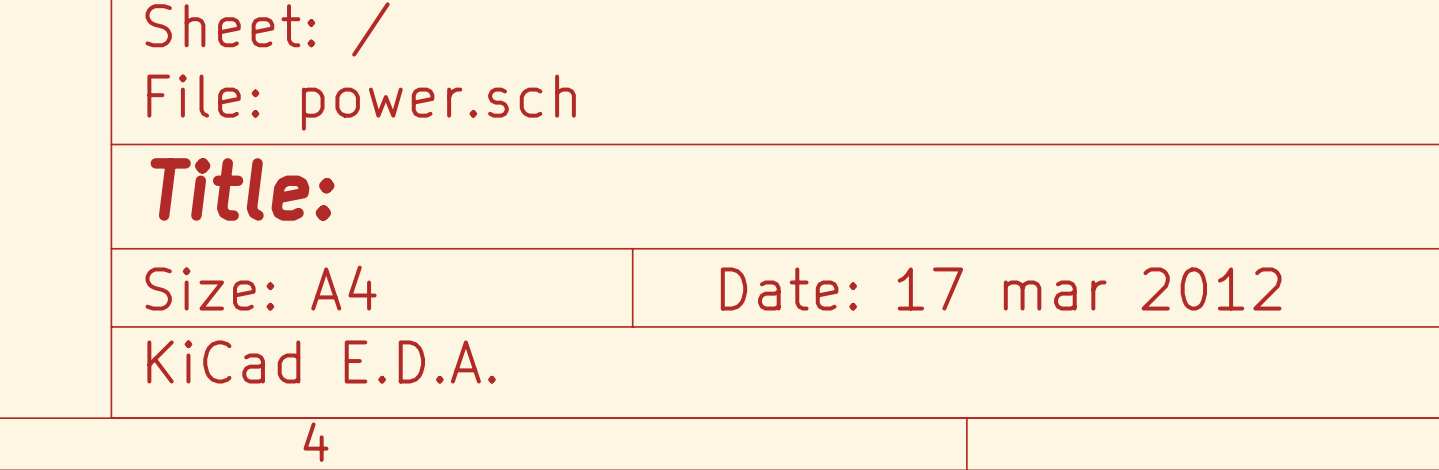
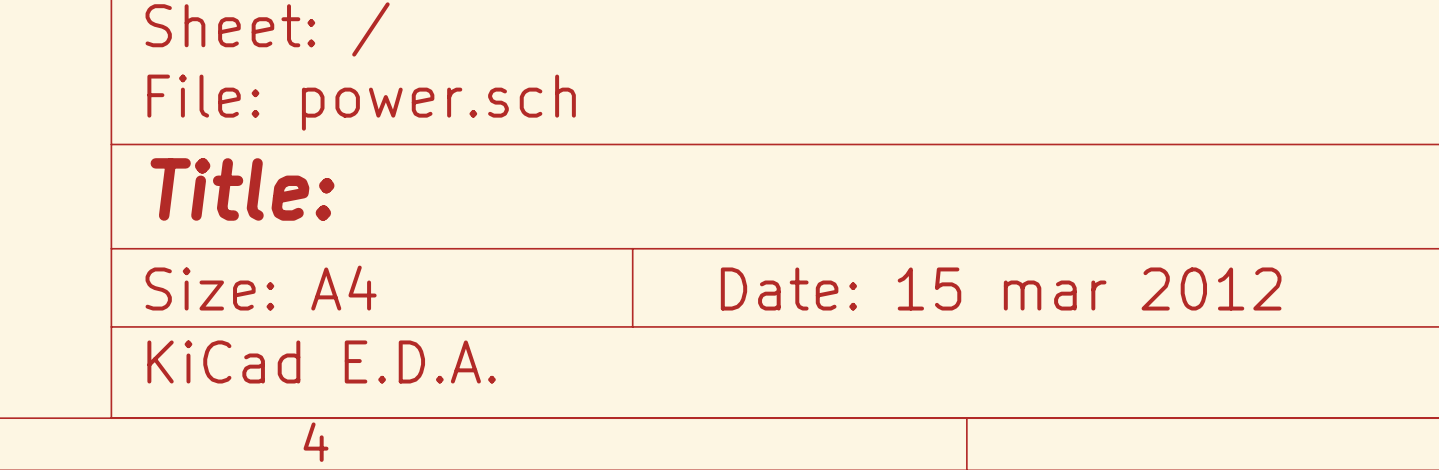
title block: Date: 17 mar 2012 (1001, 288) -> Date: 15 mar 2012 (1001, 288)

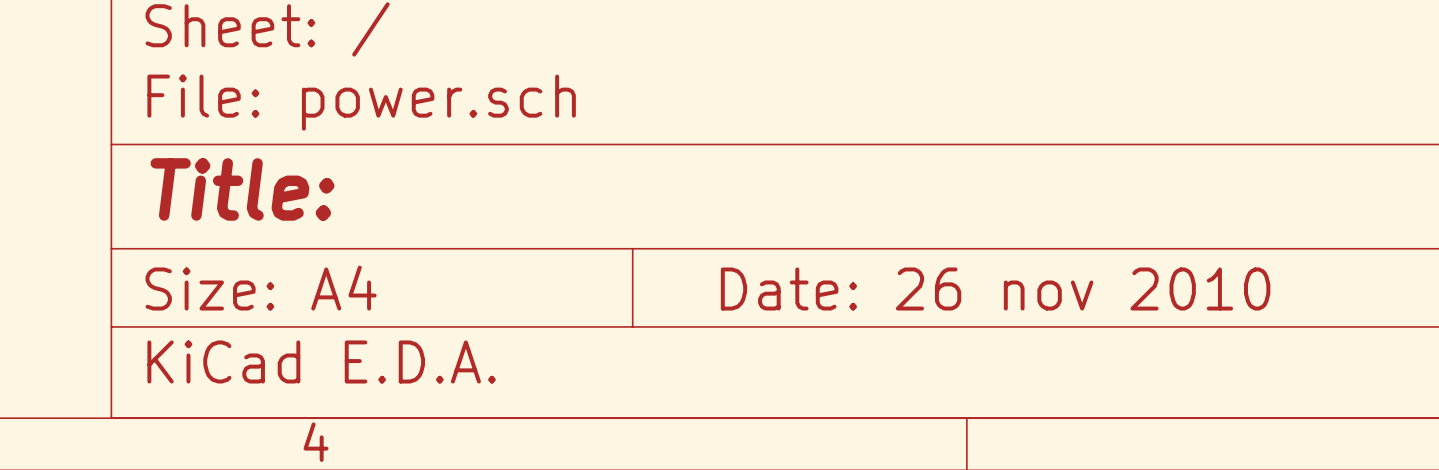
title block: Date: 15 mar 2012 (1001, 288) -> Date: 26 nov 2010 (995, 288)

